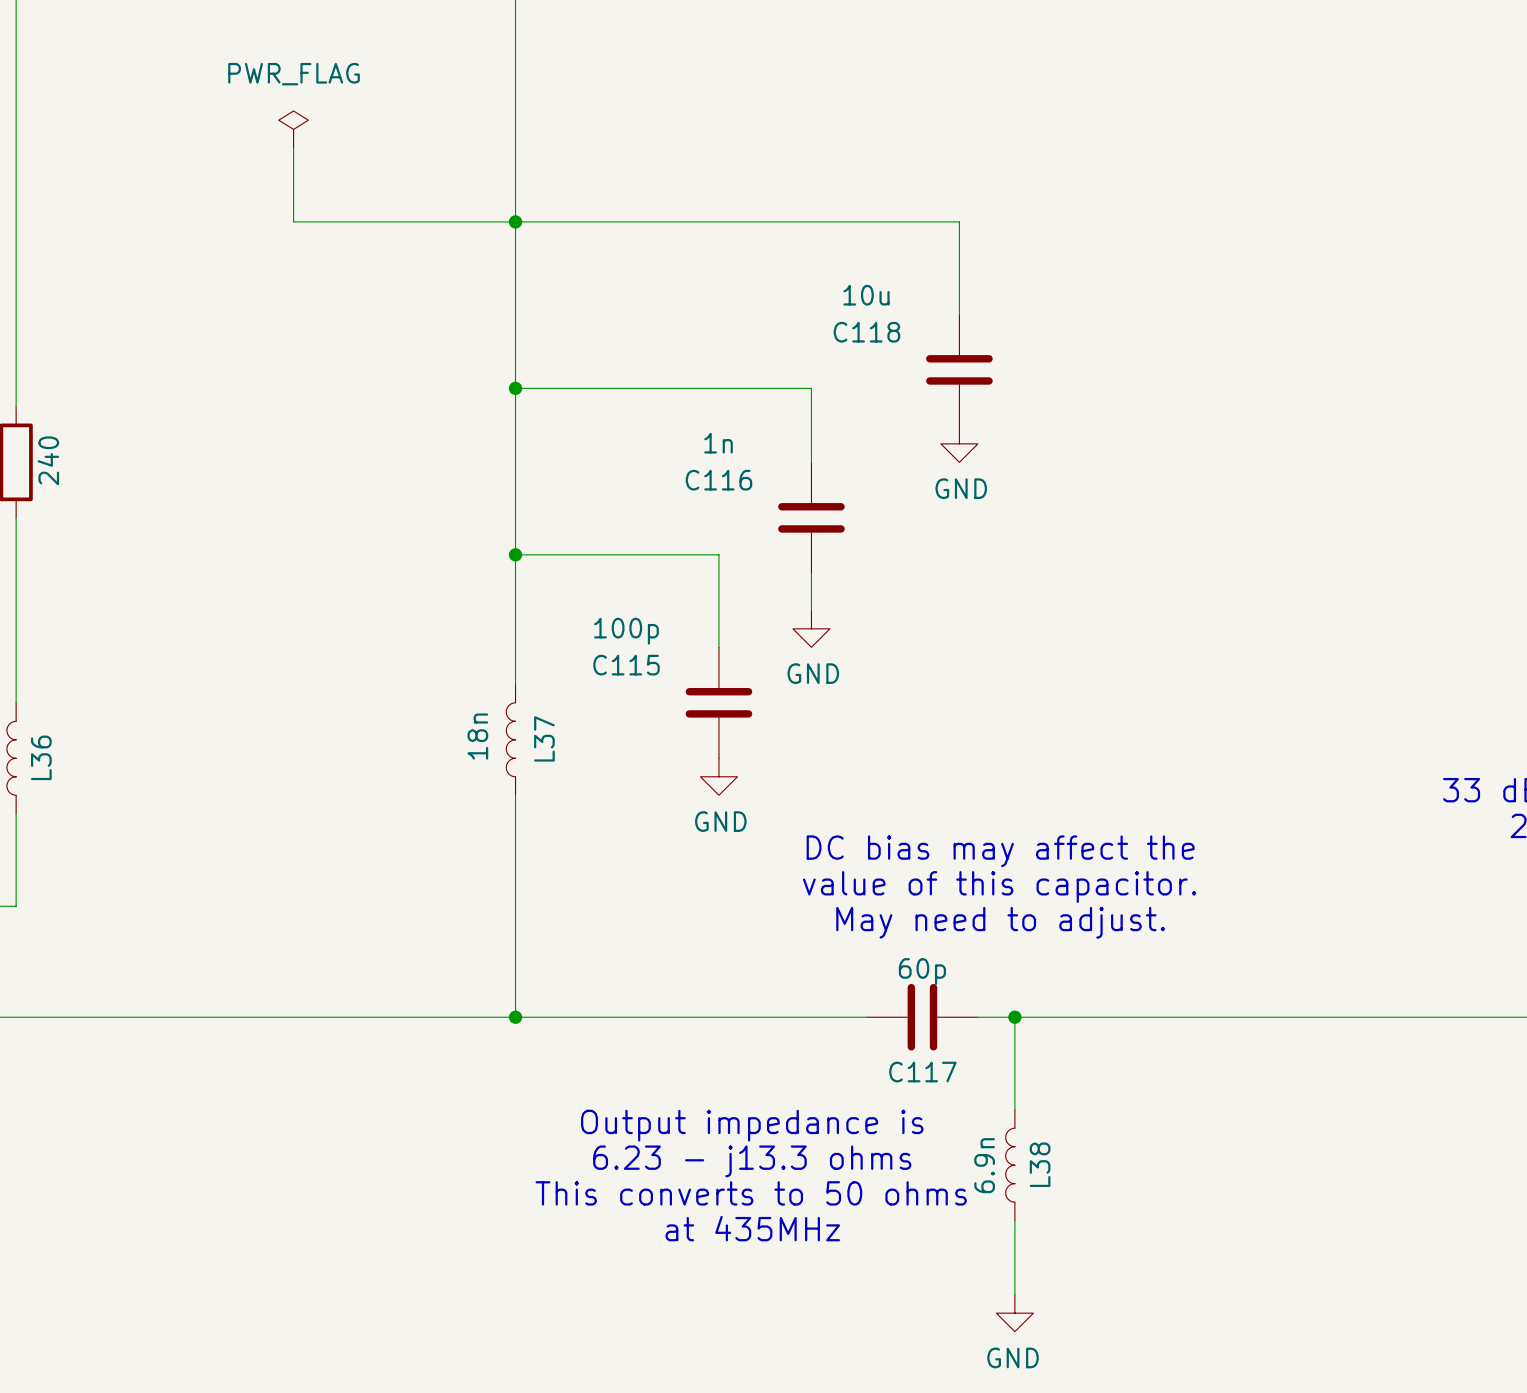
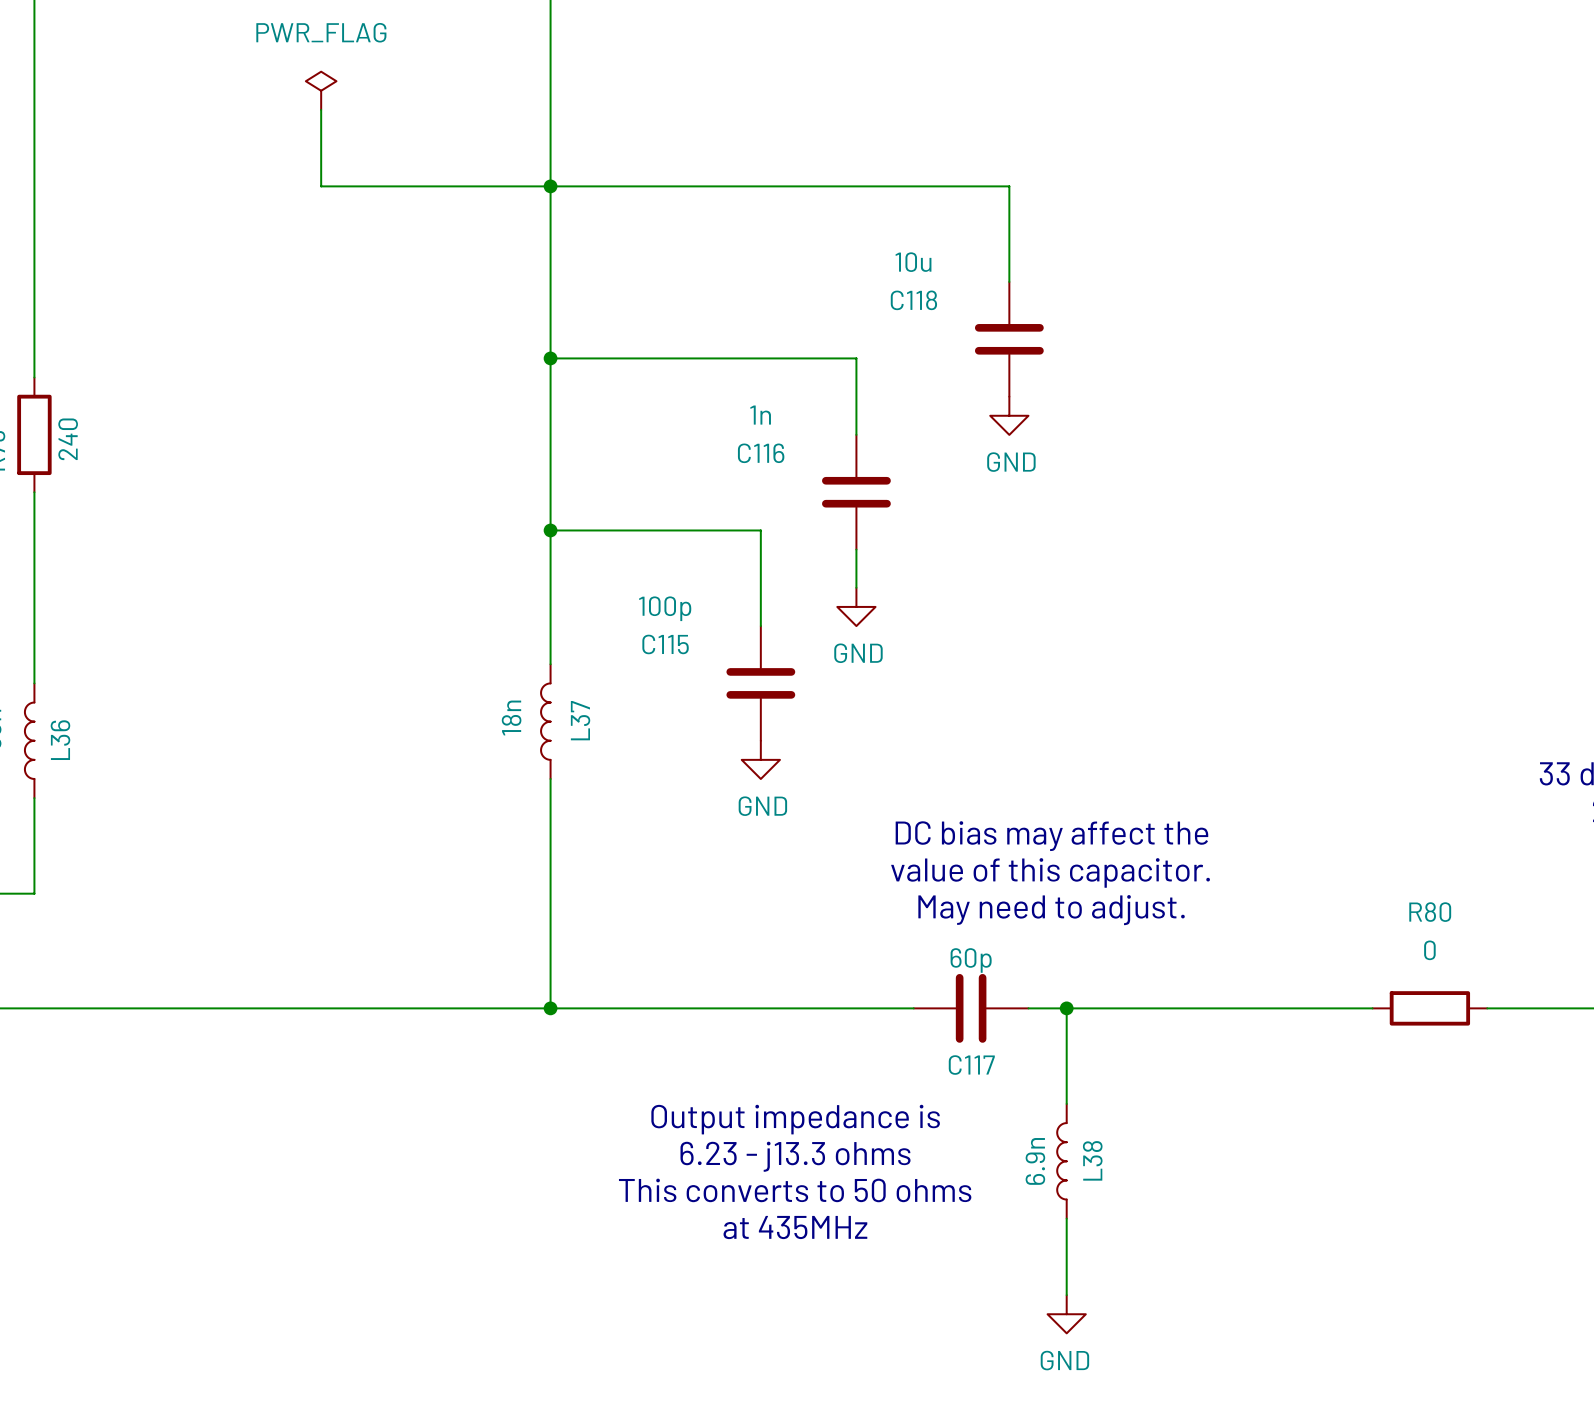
wire: (1310, 1017) (1421, 1017) -> none
R80: none -> 0 (1429, 1008)

